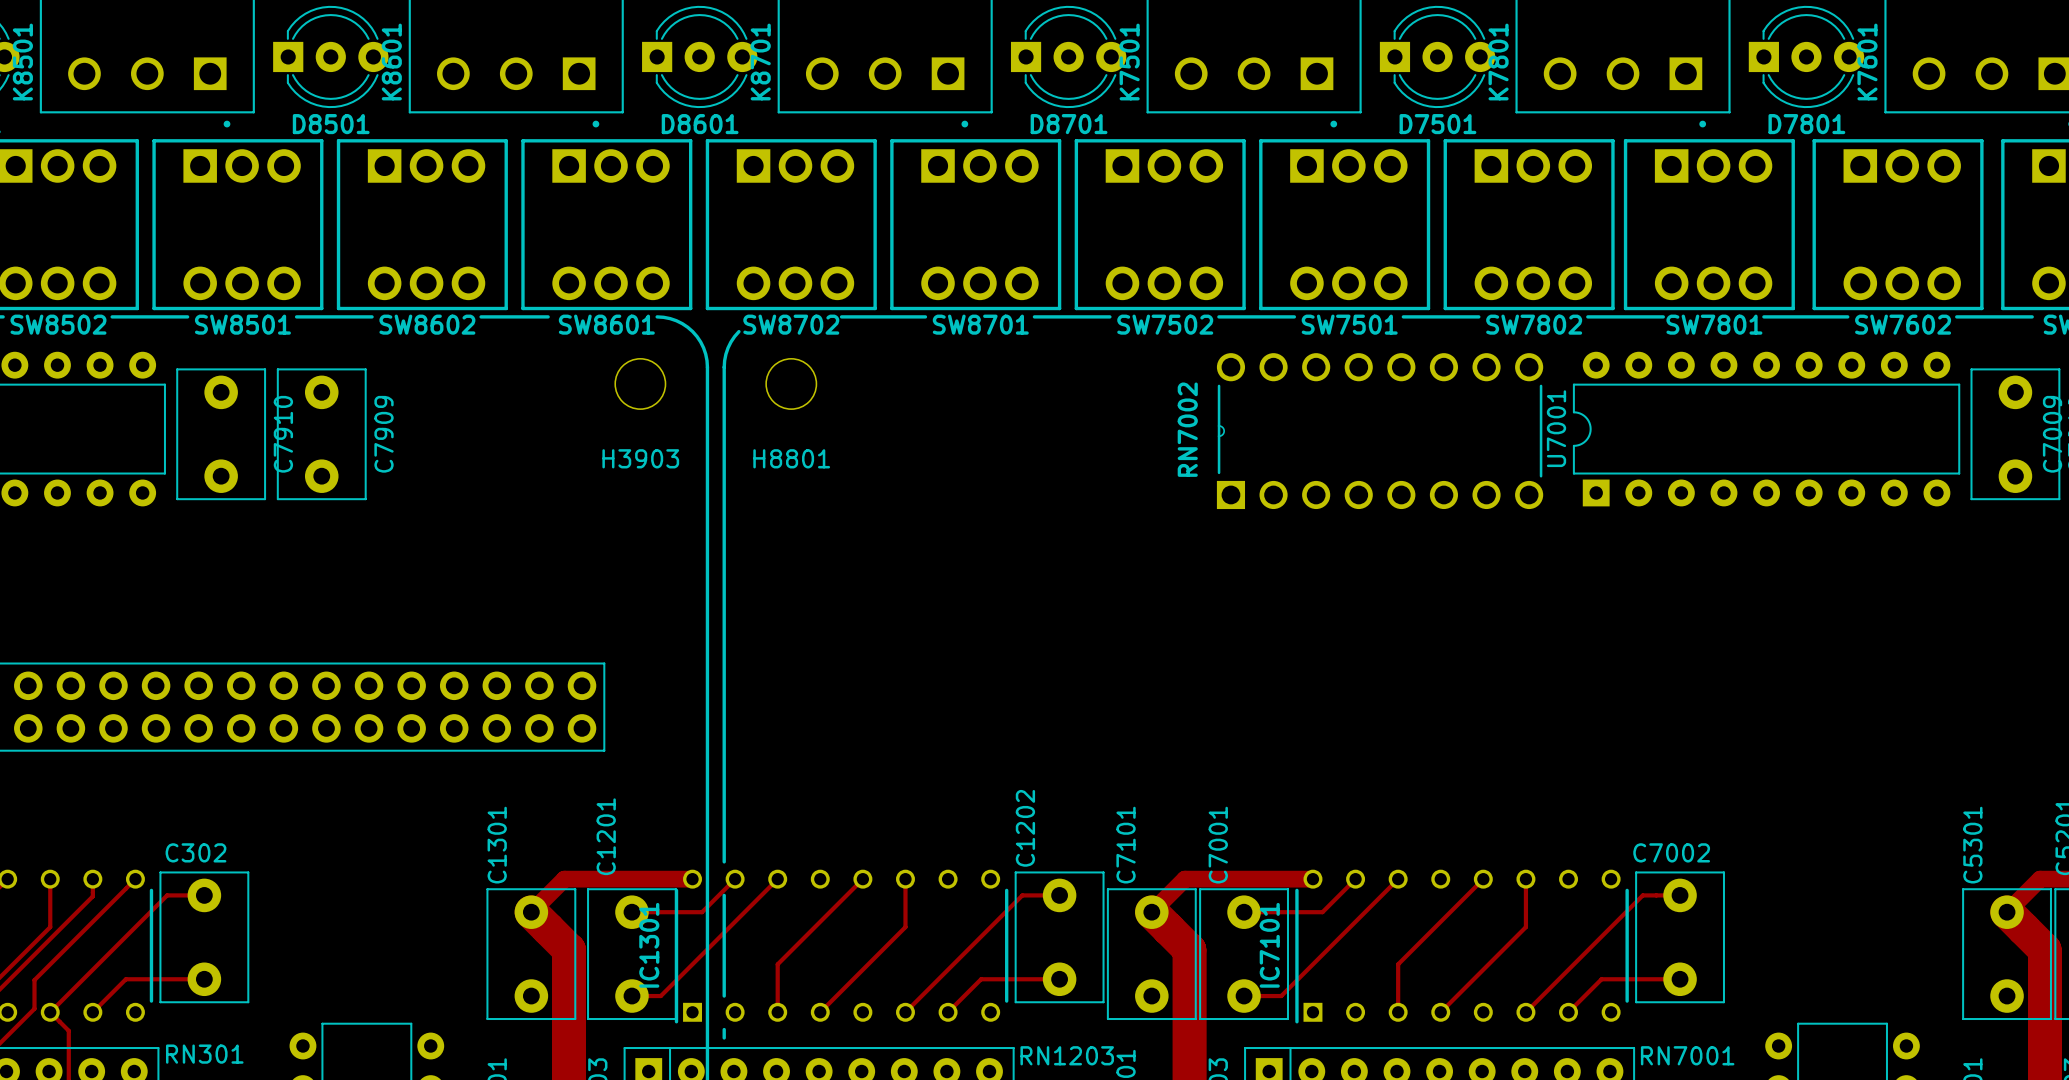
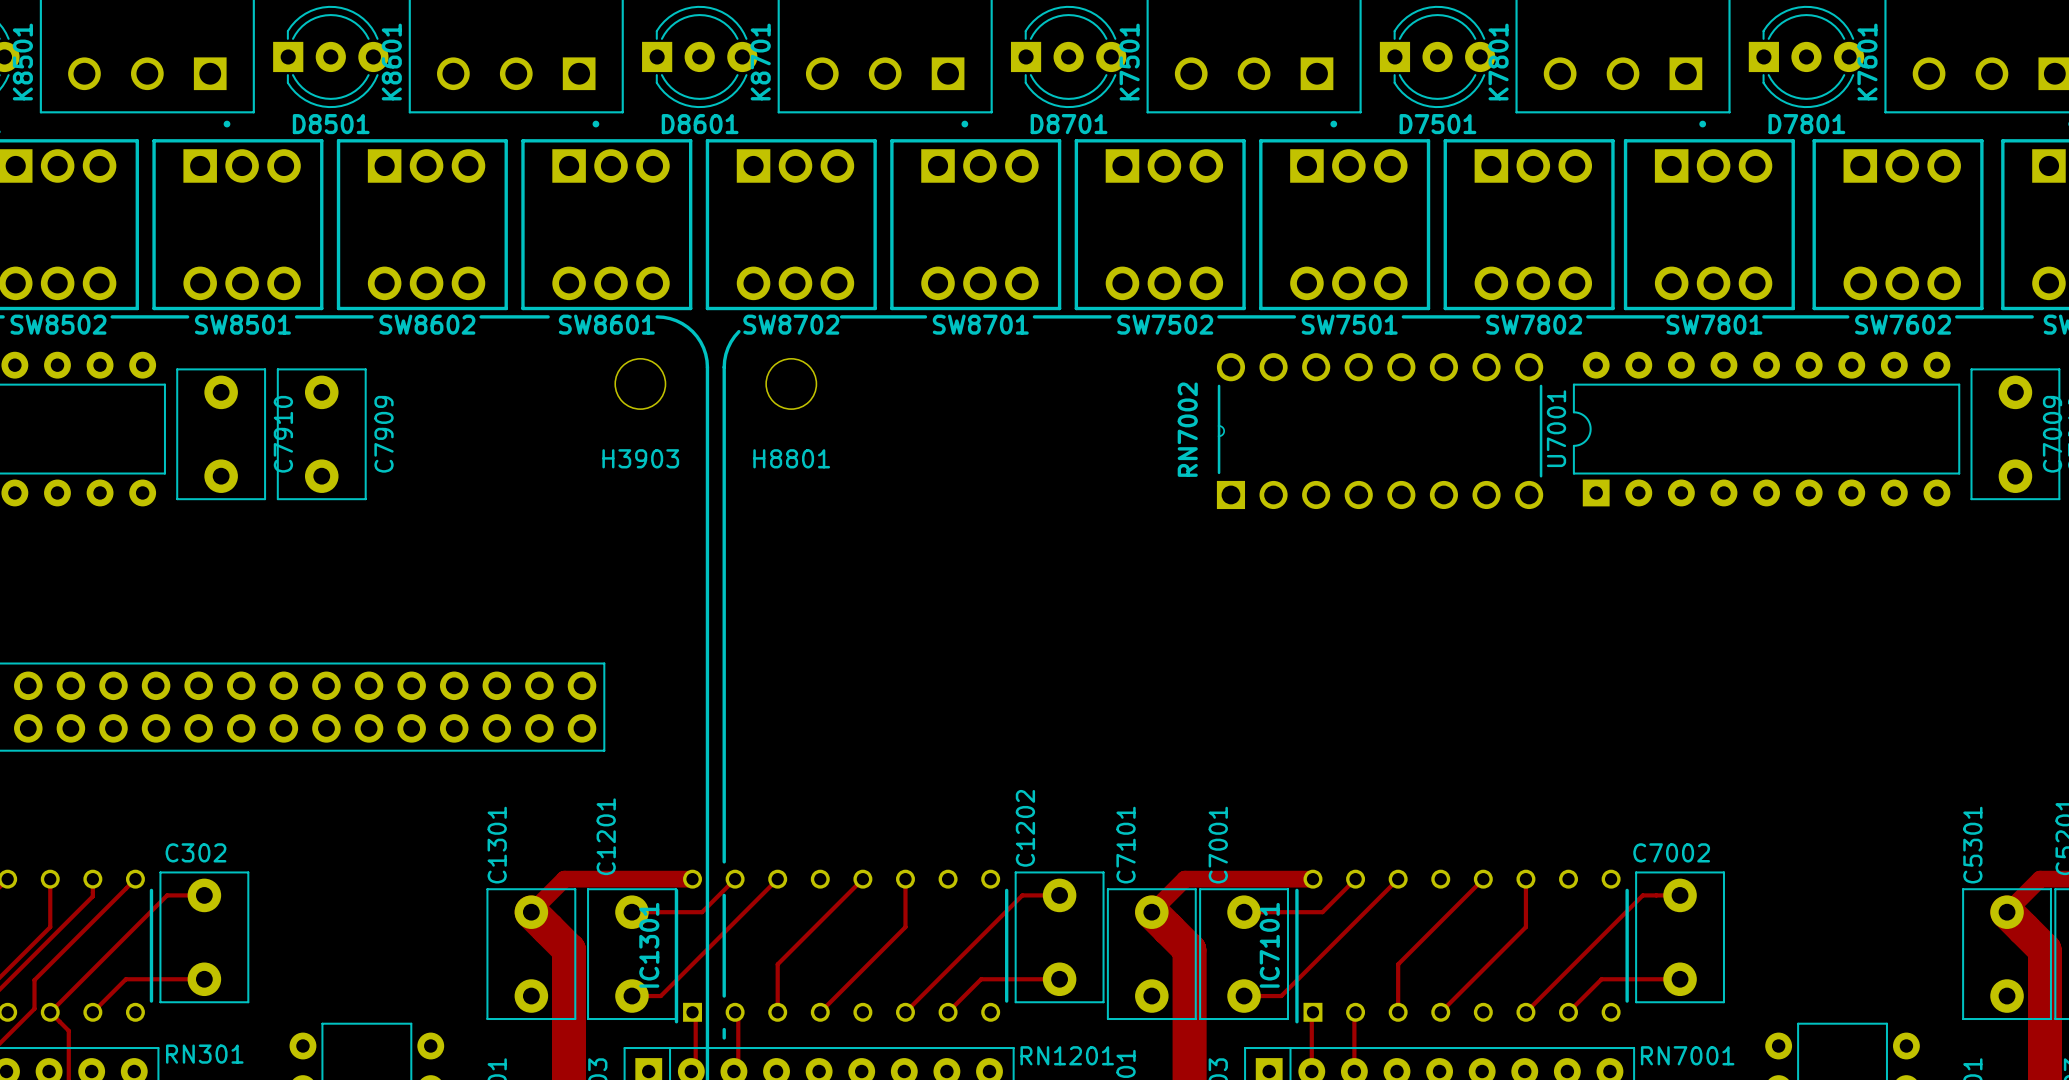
top track: none -> (692, 1012) (695, 1015) (695, 1071)
top track: none -> (735, 1012) (738, 1015) (738, 1071)
top track: none -> (1312, 1012) (1311, 1071)
top track: none -> (1355, 1012) (1354, 1071)
RN1203 name: RN1203 (1067, 1055) -> RN1201 (1067, 1055)

